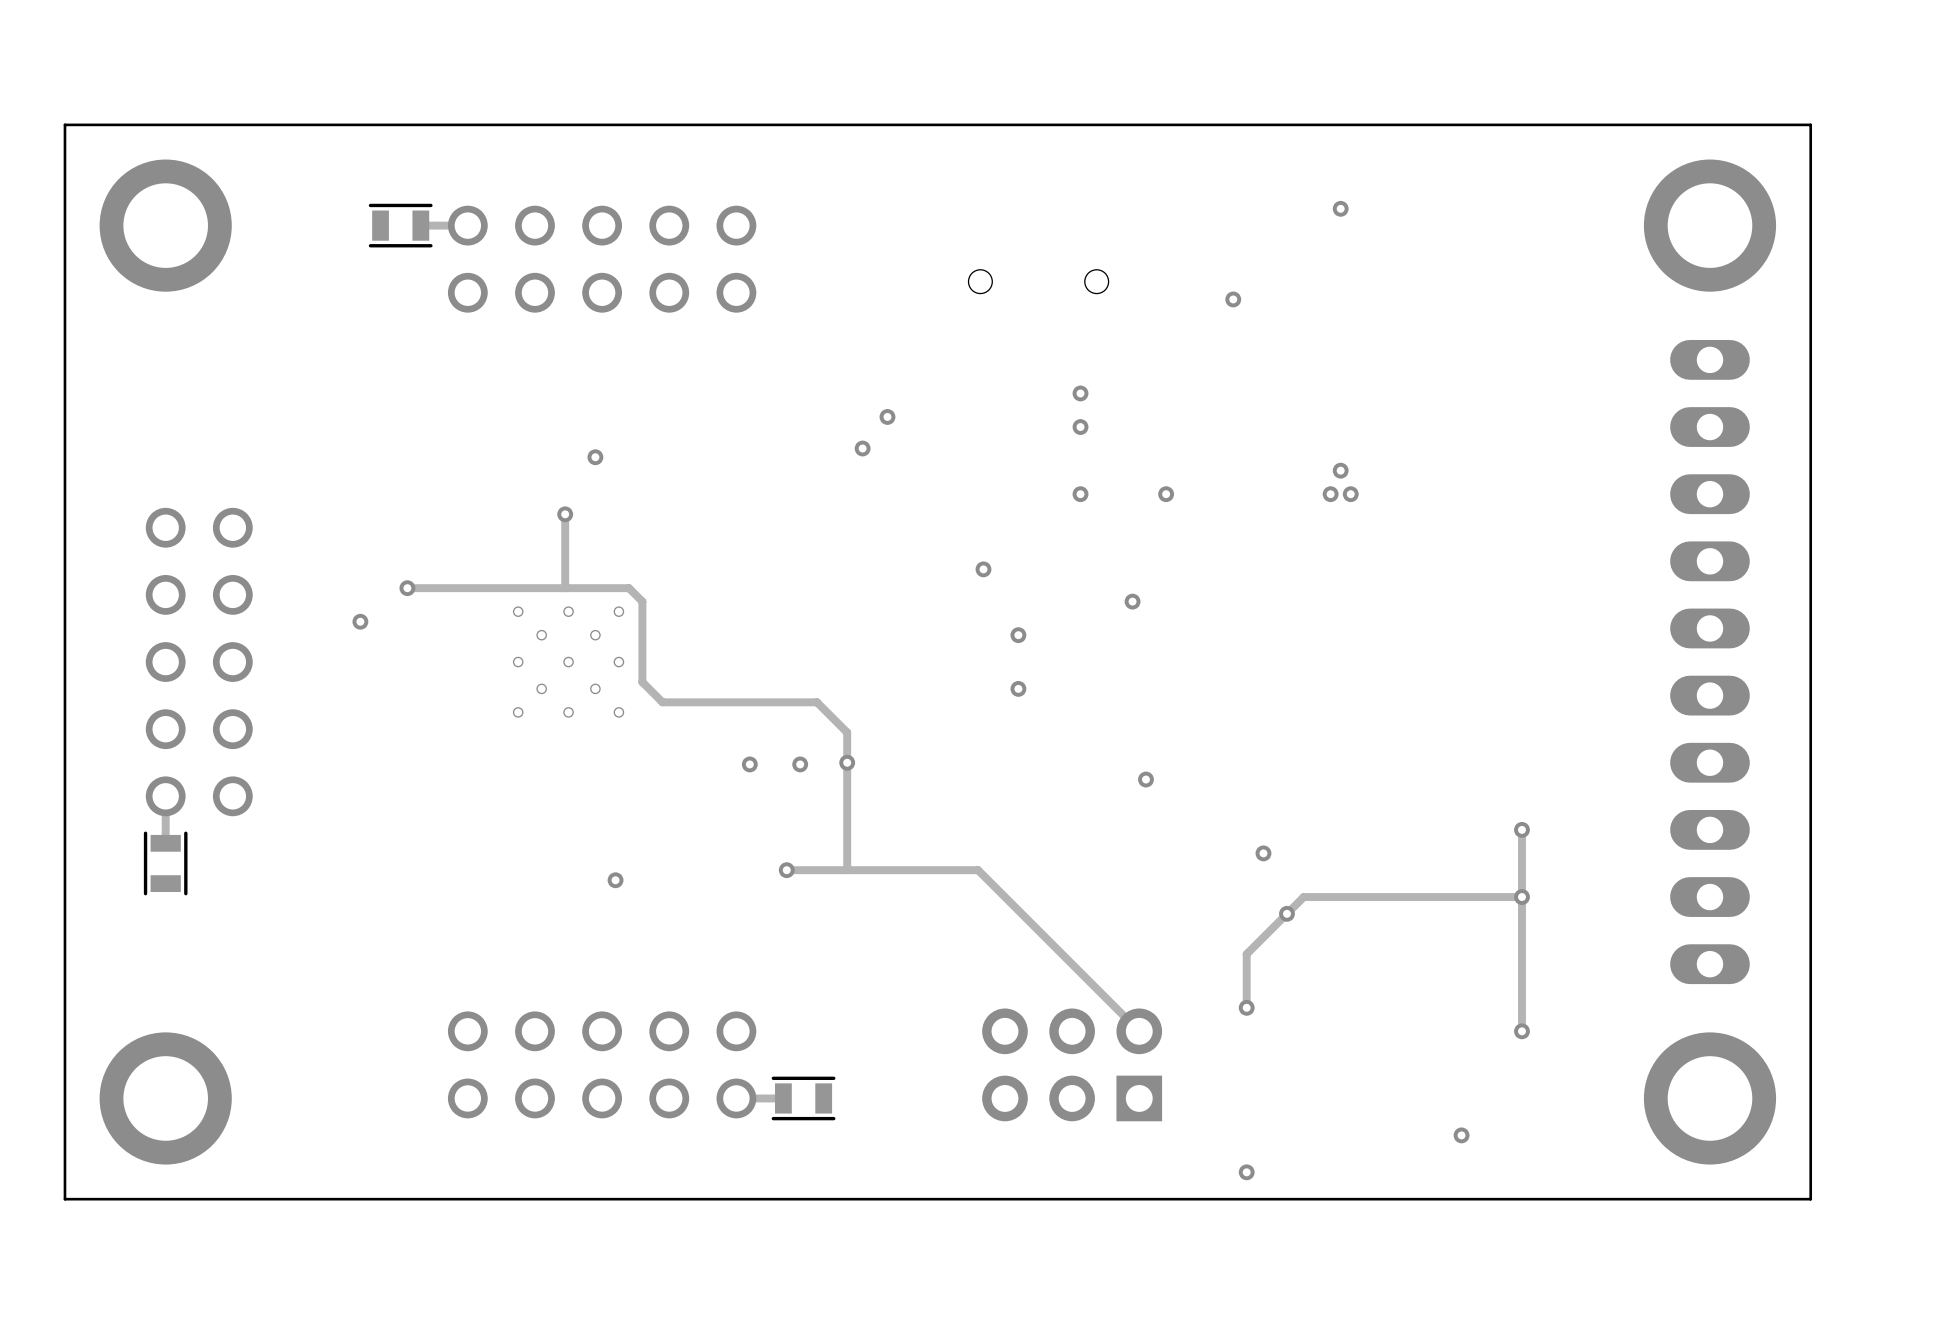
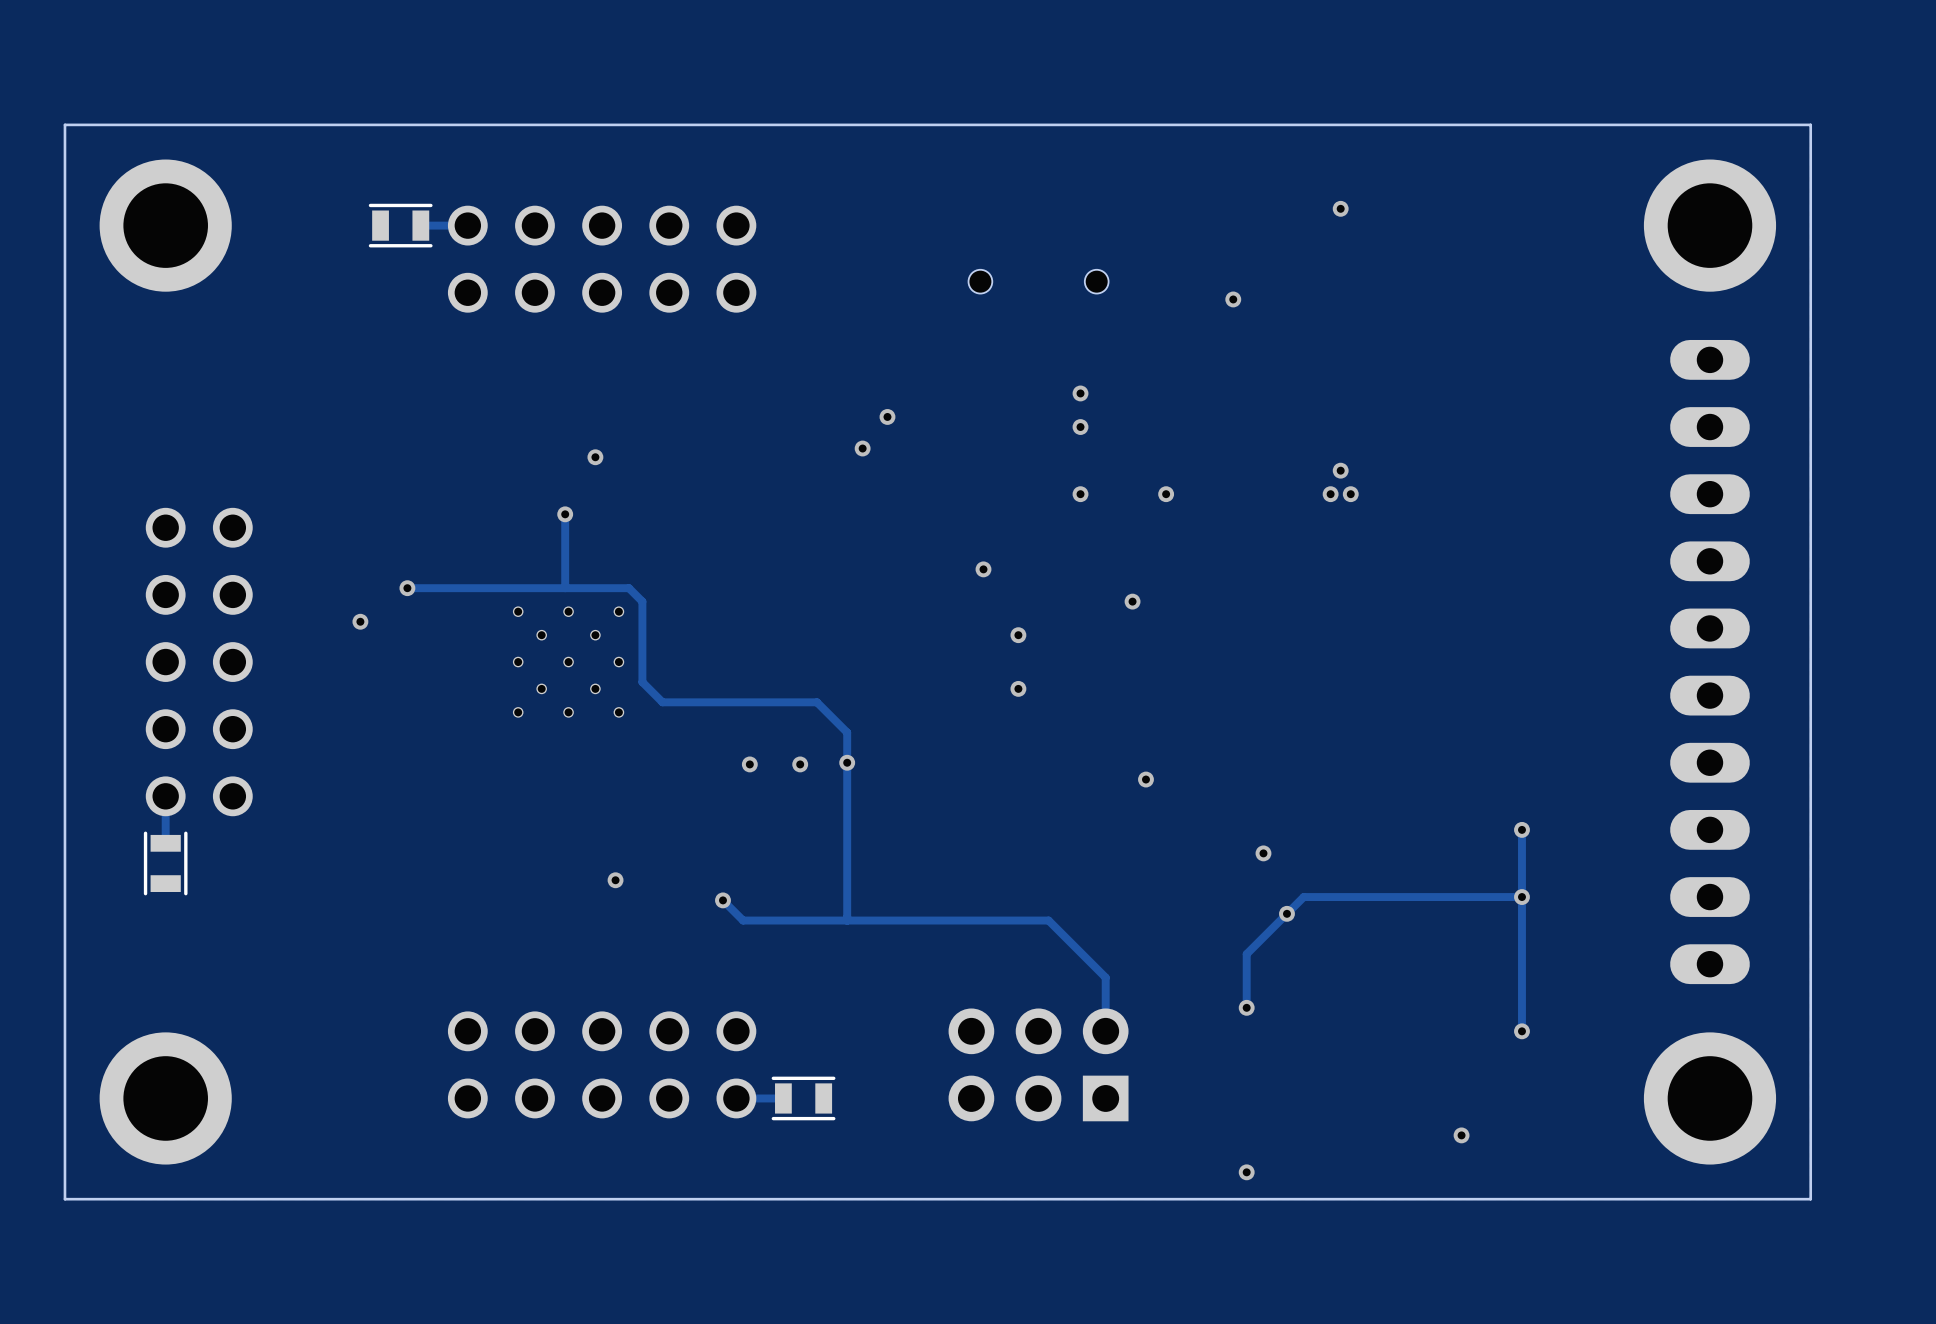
track: (786, 870) (978, 870) (1139, 1031) -> none
via position: (786, 870) -> (722, 900)
track: none -> (847, 870) (847, 920)
track: none -> (722, 900) (743, 920) (1048, 920) (1105, 977) (1105, 1031)
part position: (1072, 1064) -> (1038, 1064)

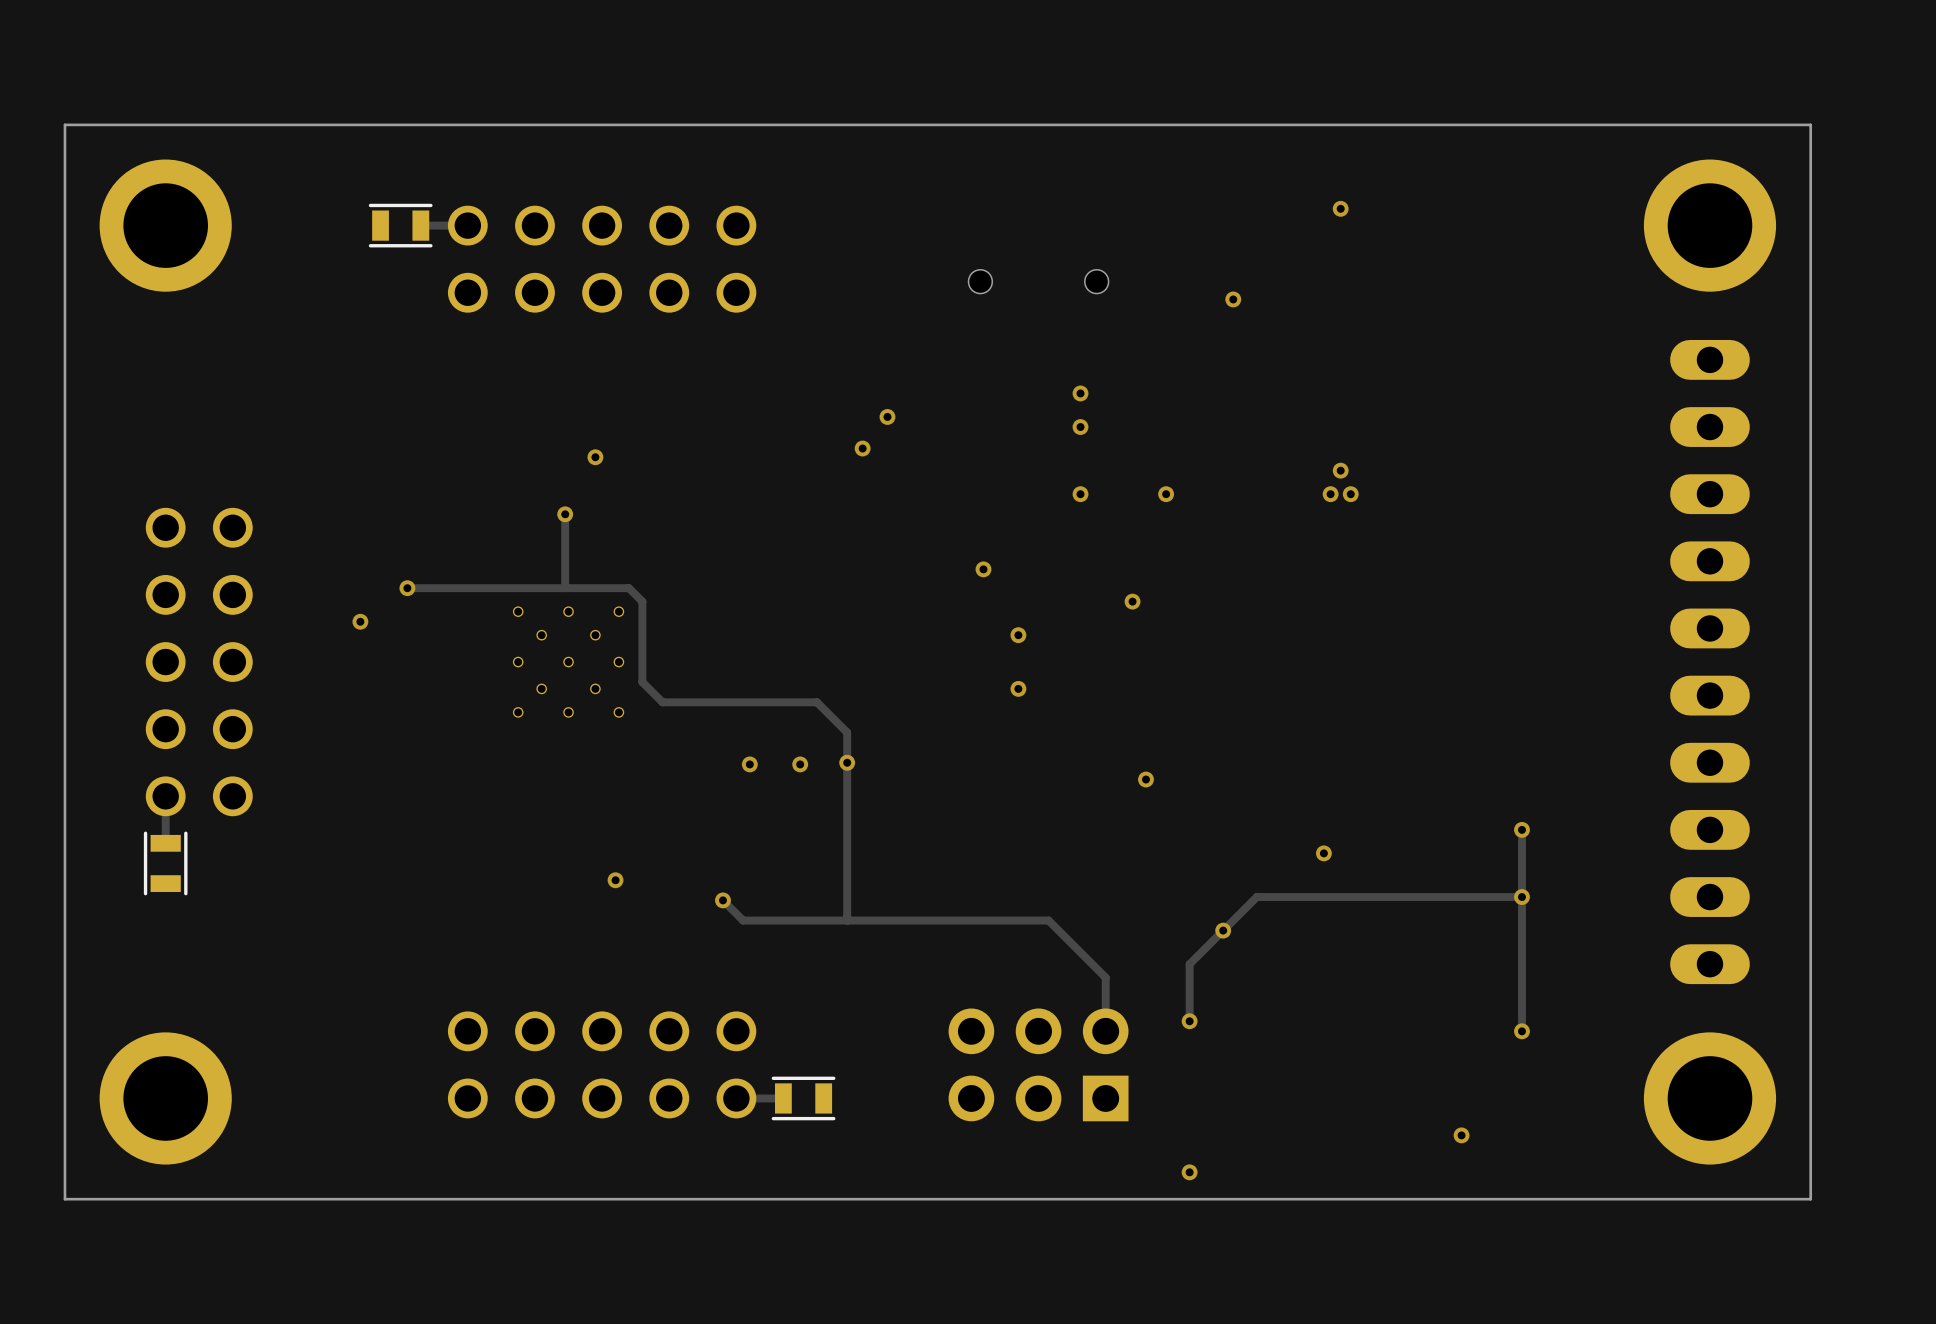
via: (1263, 853) -> none
via: none -> (1323, 853)
track: (1303, 897) (1246, 954) (1246, 1007) -> (1303, 897) (1256, 897) (1189, 964) (1189, 1021)
via: (1286, 913) -> none
via: none -> (1223, 930)
via: (1246, 1007) -> none
via: none -> (1189, 1021)
via position: (1246, 1172) -> (1189, 1172)

